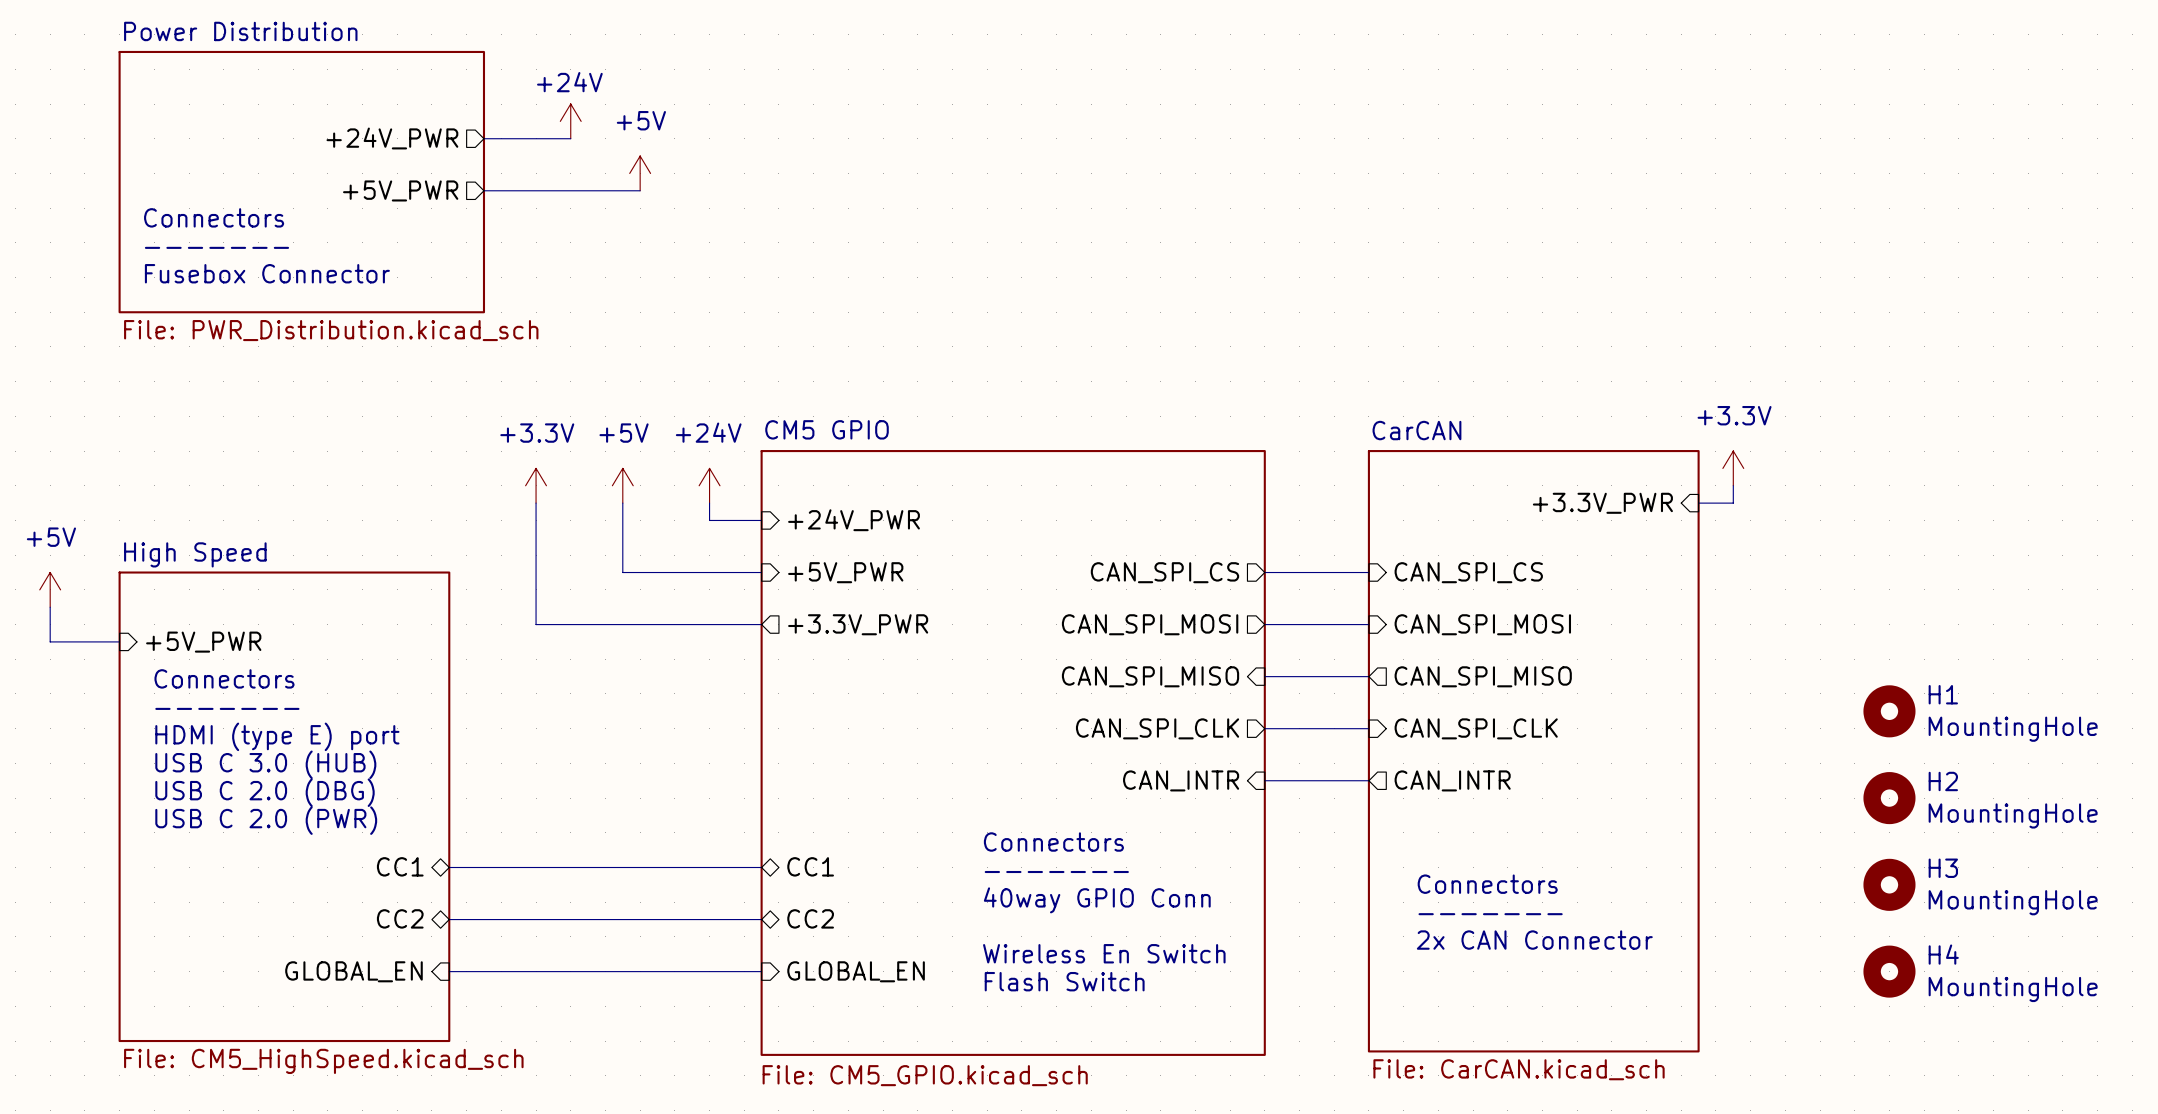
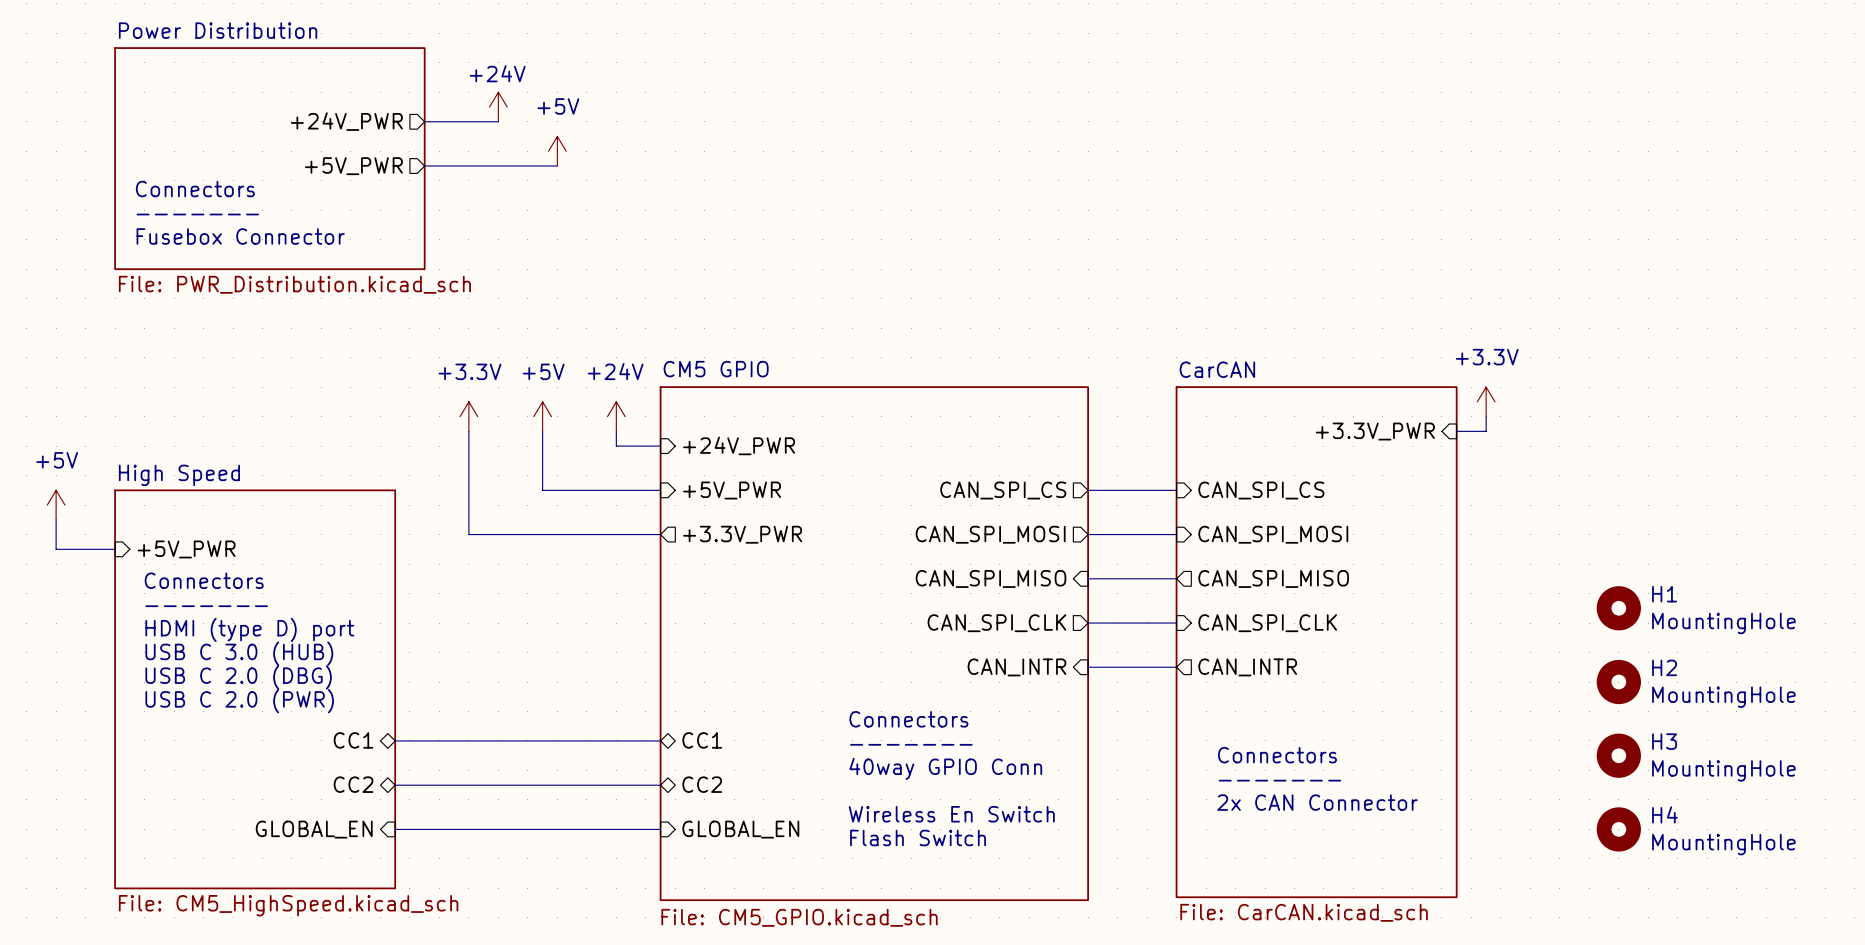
text: HDMI (type E) port (277, 736) -> HDMI (type D) port (249, 629)

